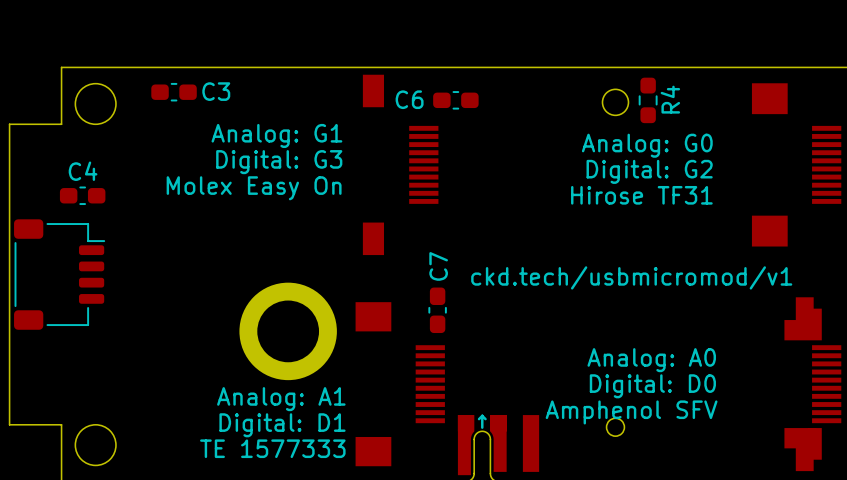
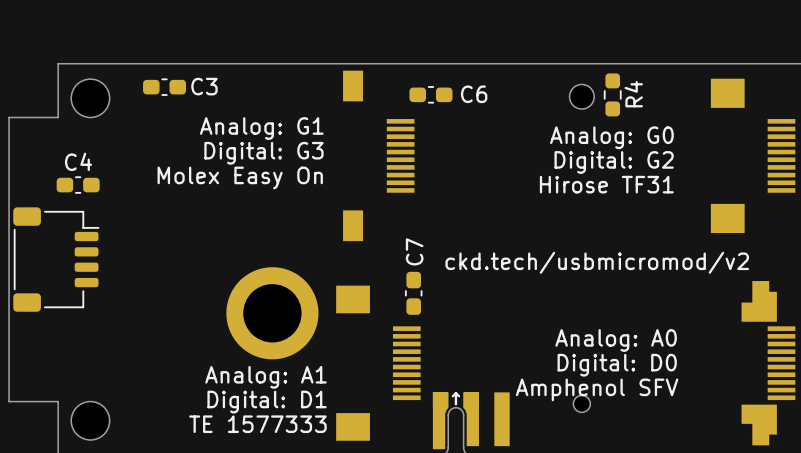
C6 name position: C6 (409, 99) -> C6 (474, 94)
text: ckd.tech/usbmicromod/v1 (631, 277) -> ckd.tech/usbmicromod/v2 (597, 262)

